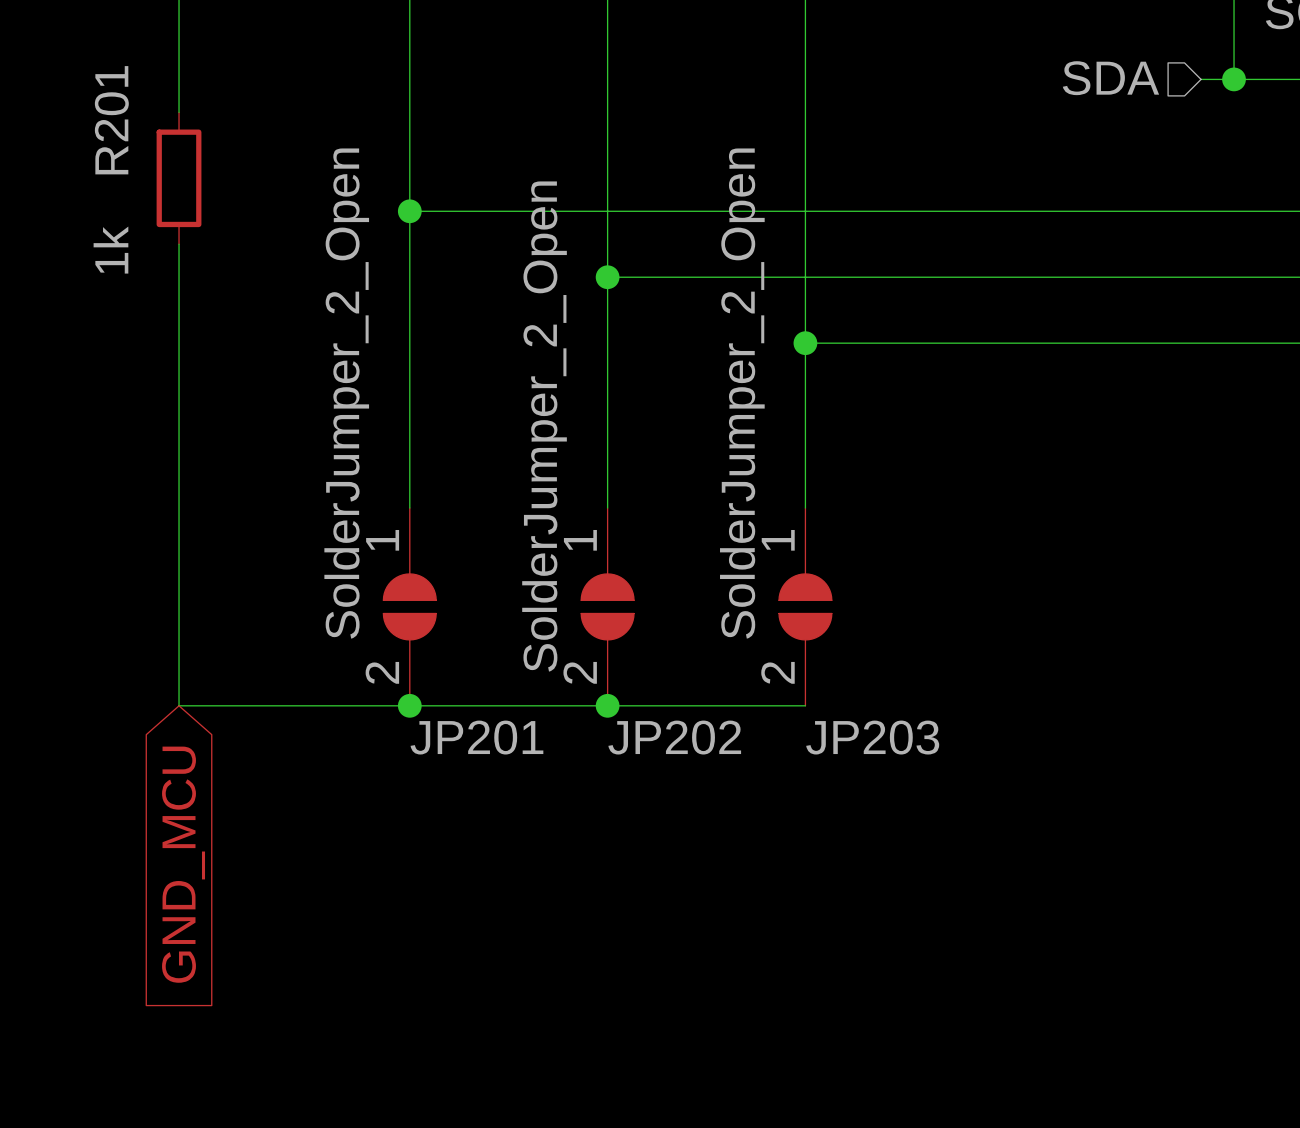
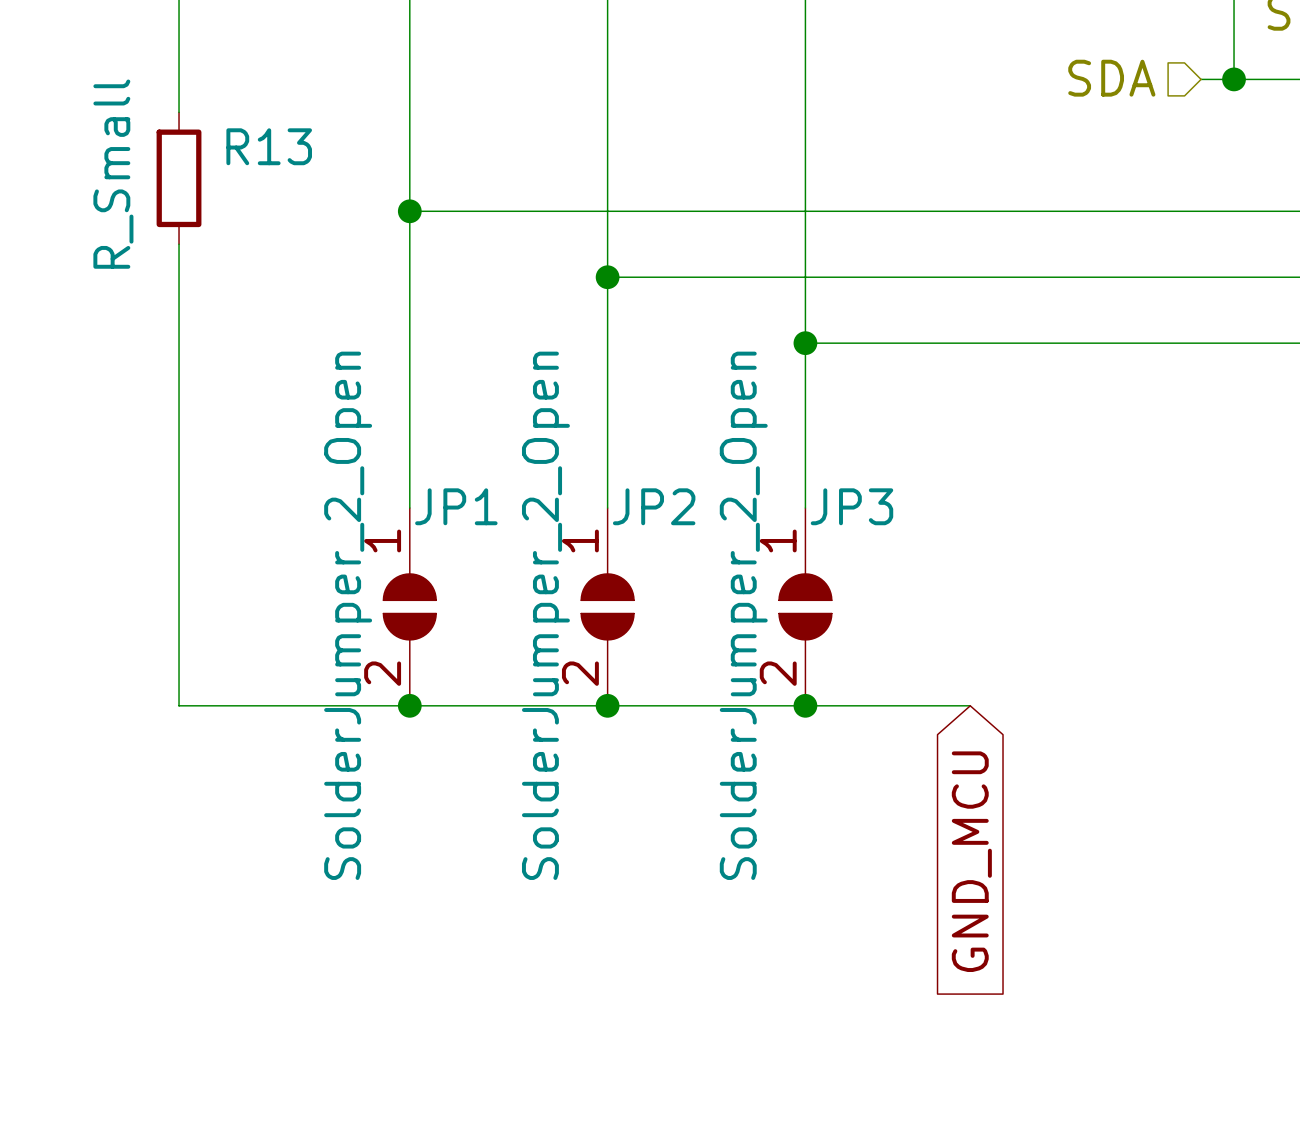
R201 name: R201 (111, 120) -> R13 (269, 146)
R201 value: 1k (110, 250) -> R_Small (113, 174)
JP201 value position: SolderJumper_2_Open (346, 393) -> SolderJumper_2_Open (348, 615)
JP203 value position: SolderJumper_2_Open (742, 393) -> SolderJumper_2_Open (743, 615)
JP202 value position: SolderJumper_2_Open (544, 426) -> SolderJumper_2_Open (545, 615)
wire: none -> (805, 705) (970, 705)
junction: none -> (805, 705)
JP201 name: JP201 (476, 737) -> JP1 (456, 506)
JP202 name: JP202 (674, 737) -> JP2 (654, 506)
JP203 name: JP203 (872, 737) -> JP3 (851, 506)
global label: GND_MCU (183, 864) -> none
global label: none -> GND_MCU (971, 861)

